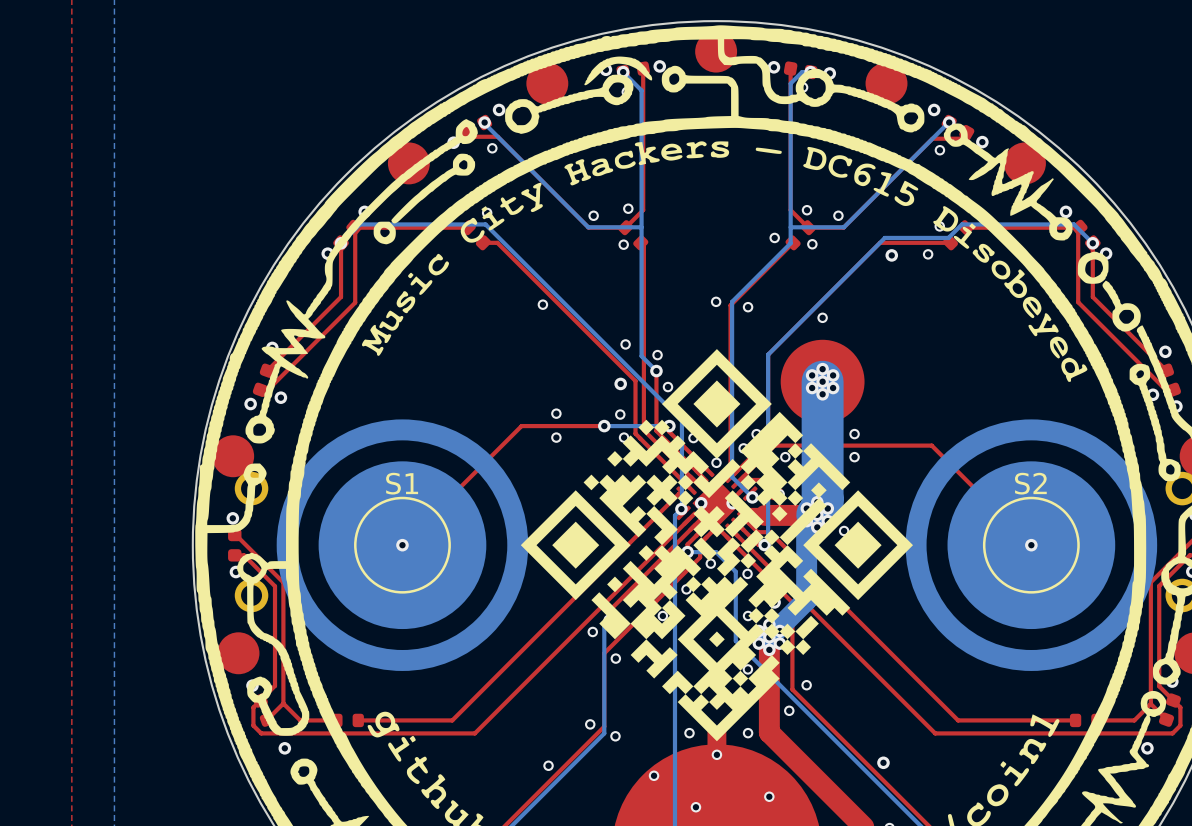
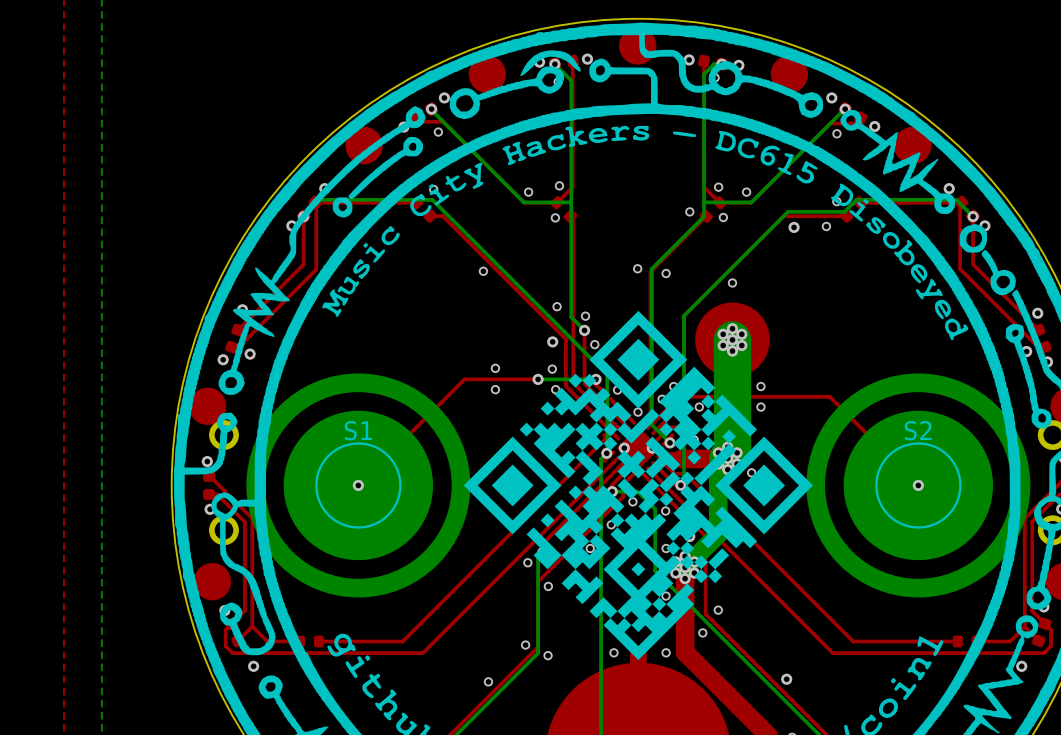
via: (716, 754) -> none
via: (654, 775) -> none
via: (769, 796) -> none
via: (695, 807) -> none

